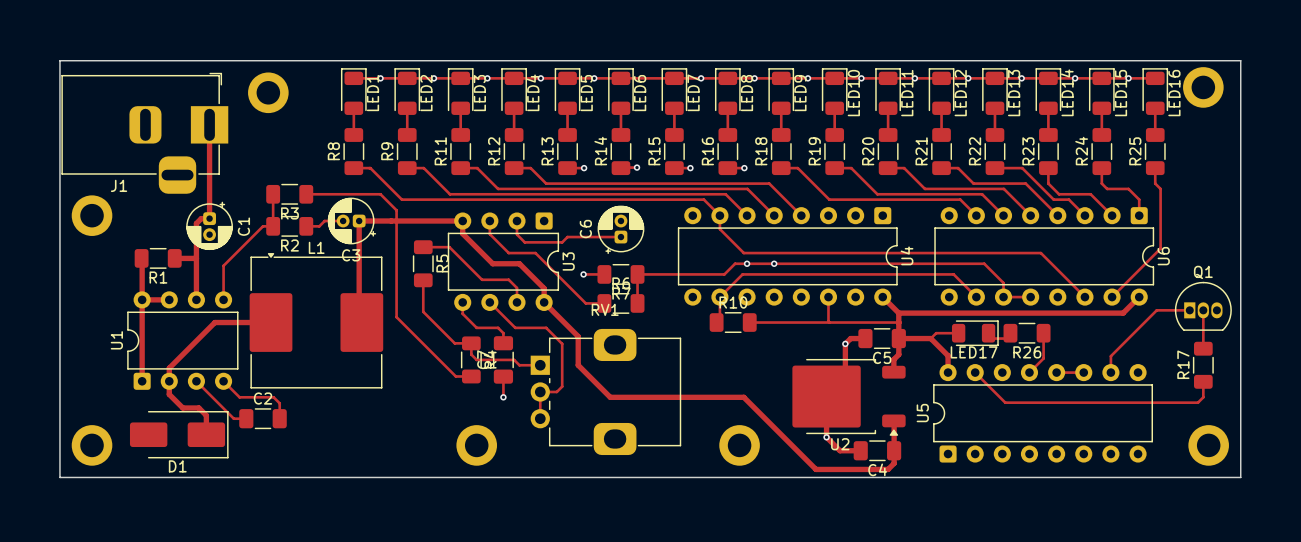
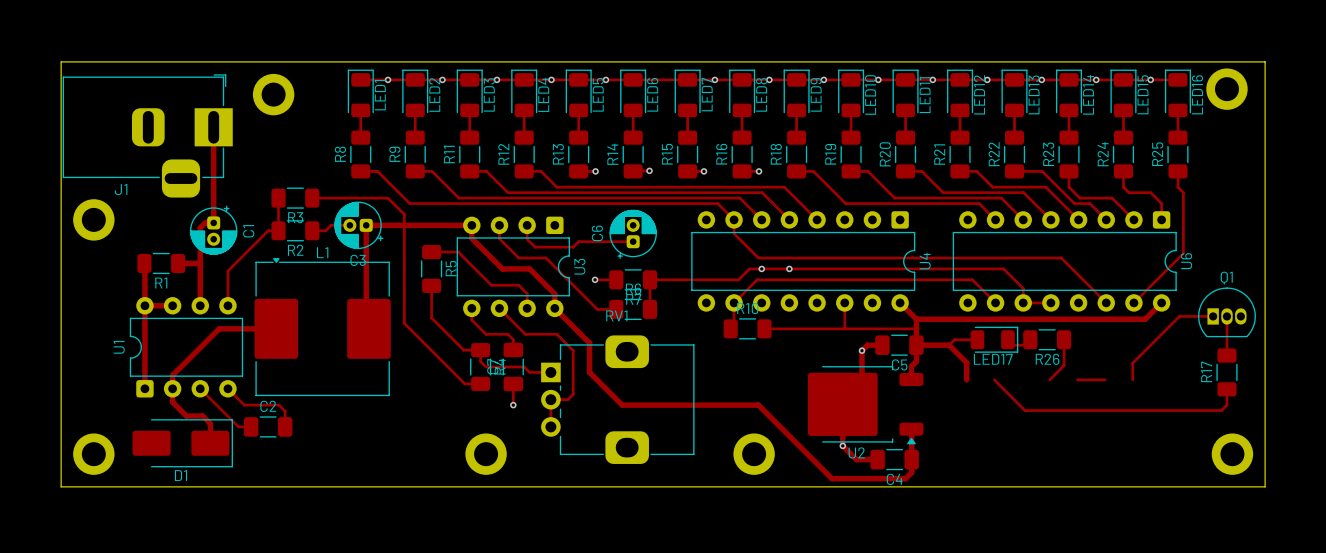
U5: (1043, 413) -> none

